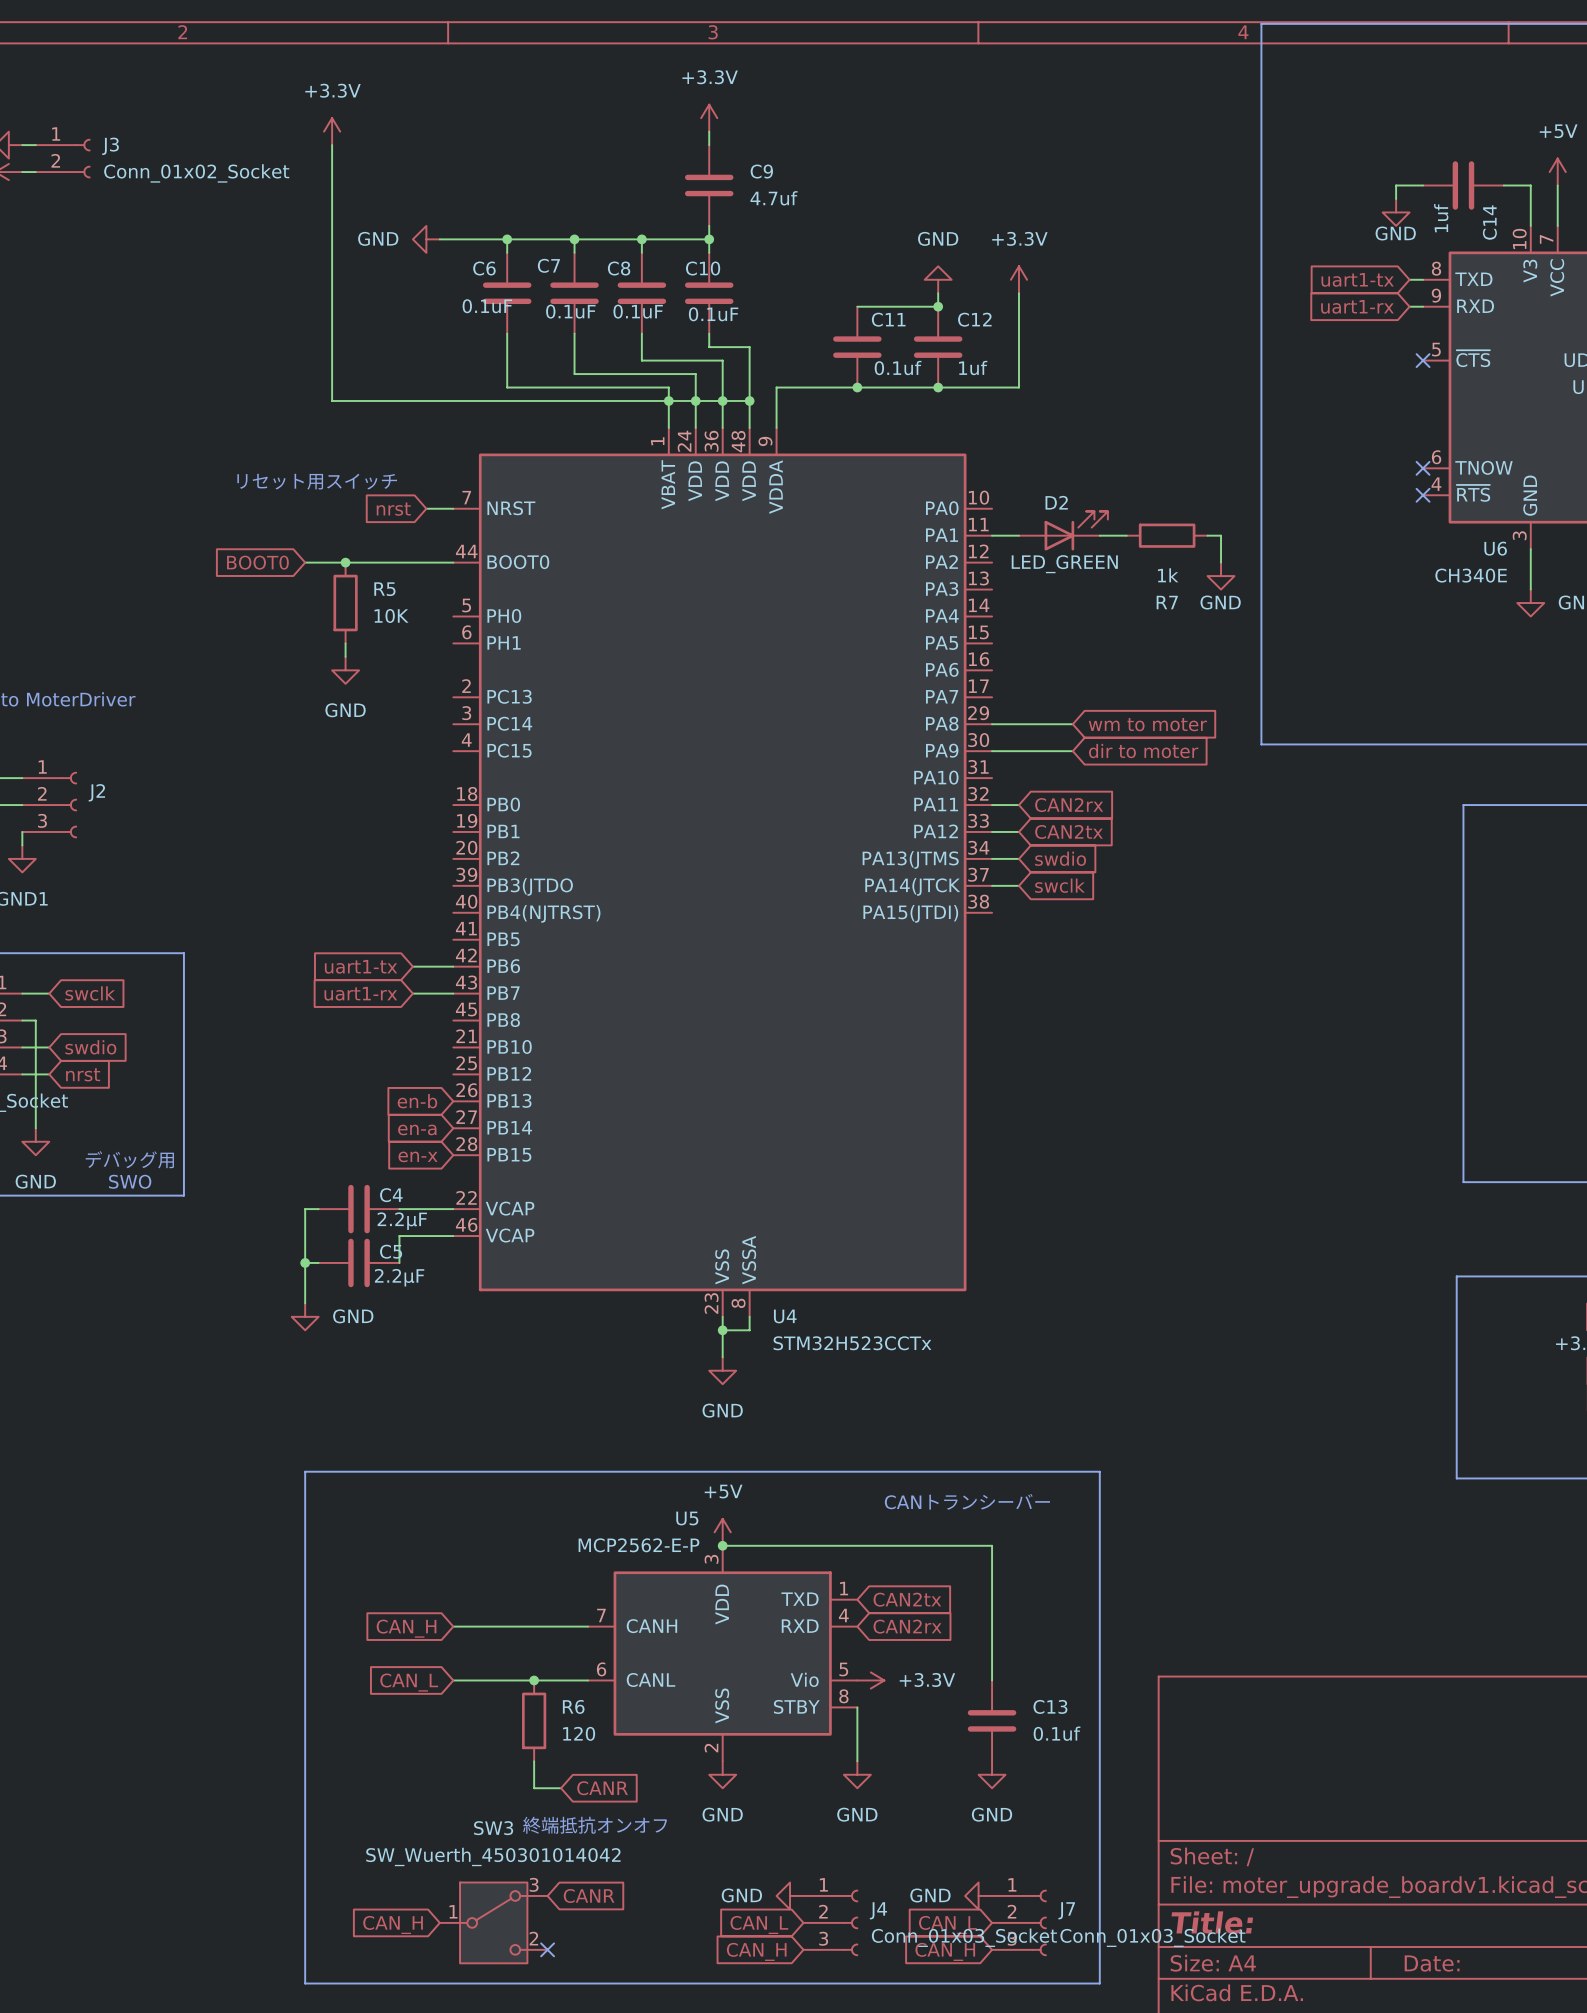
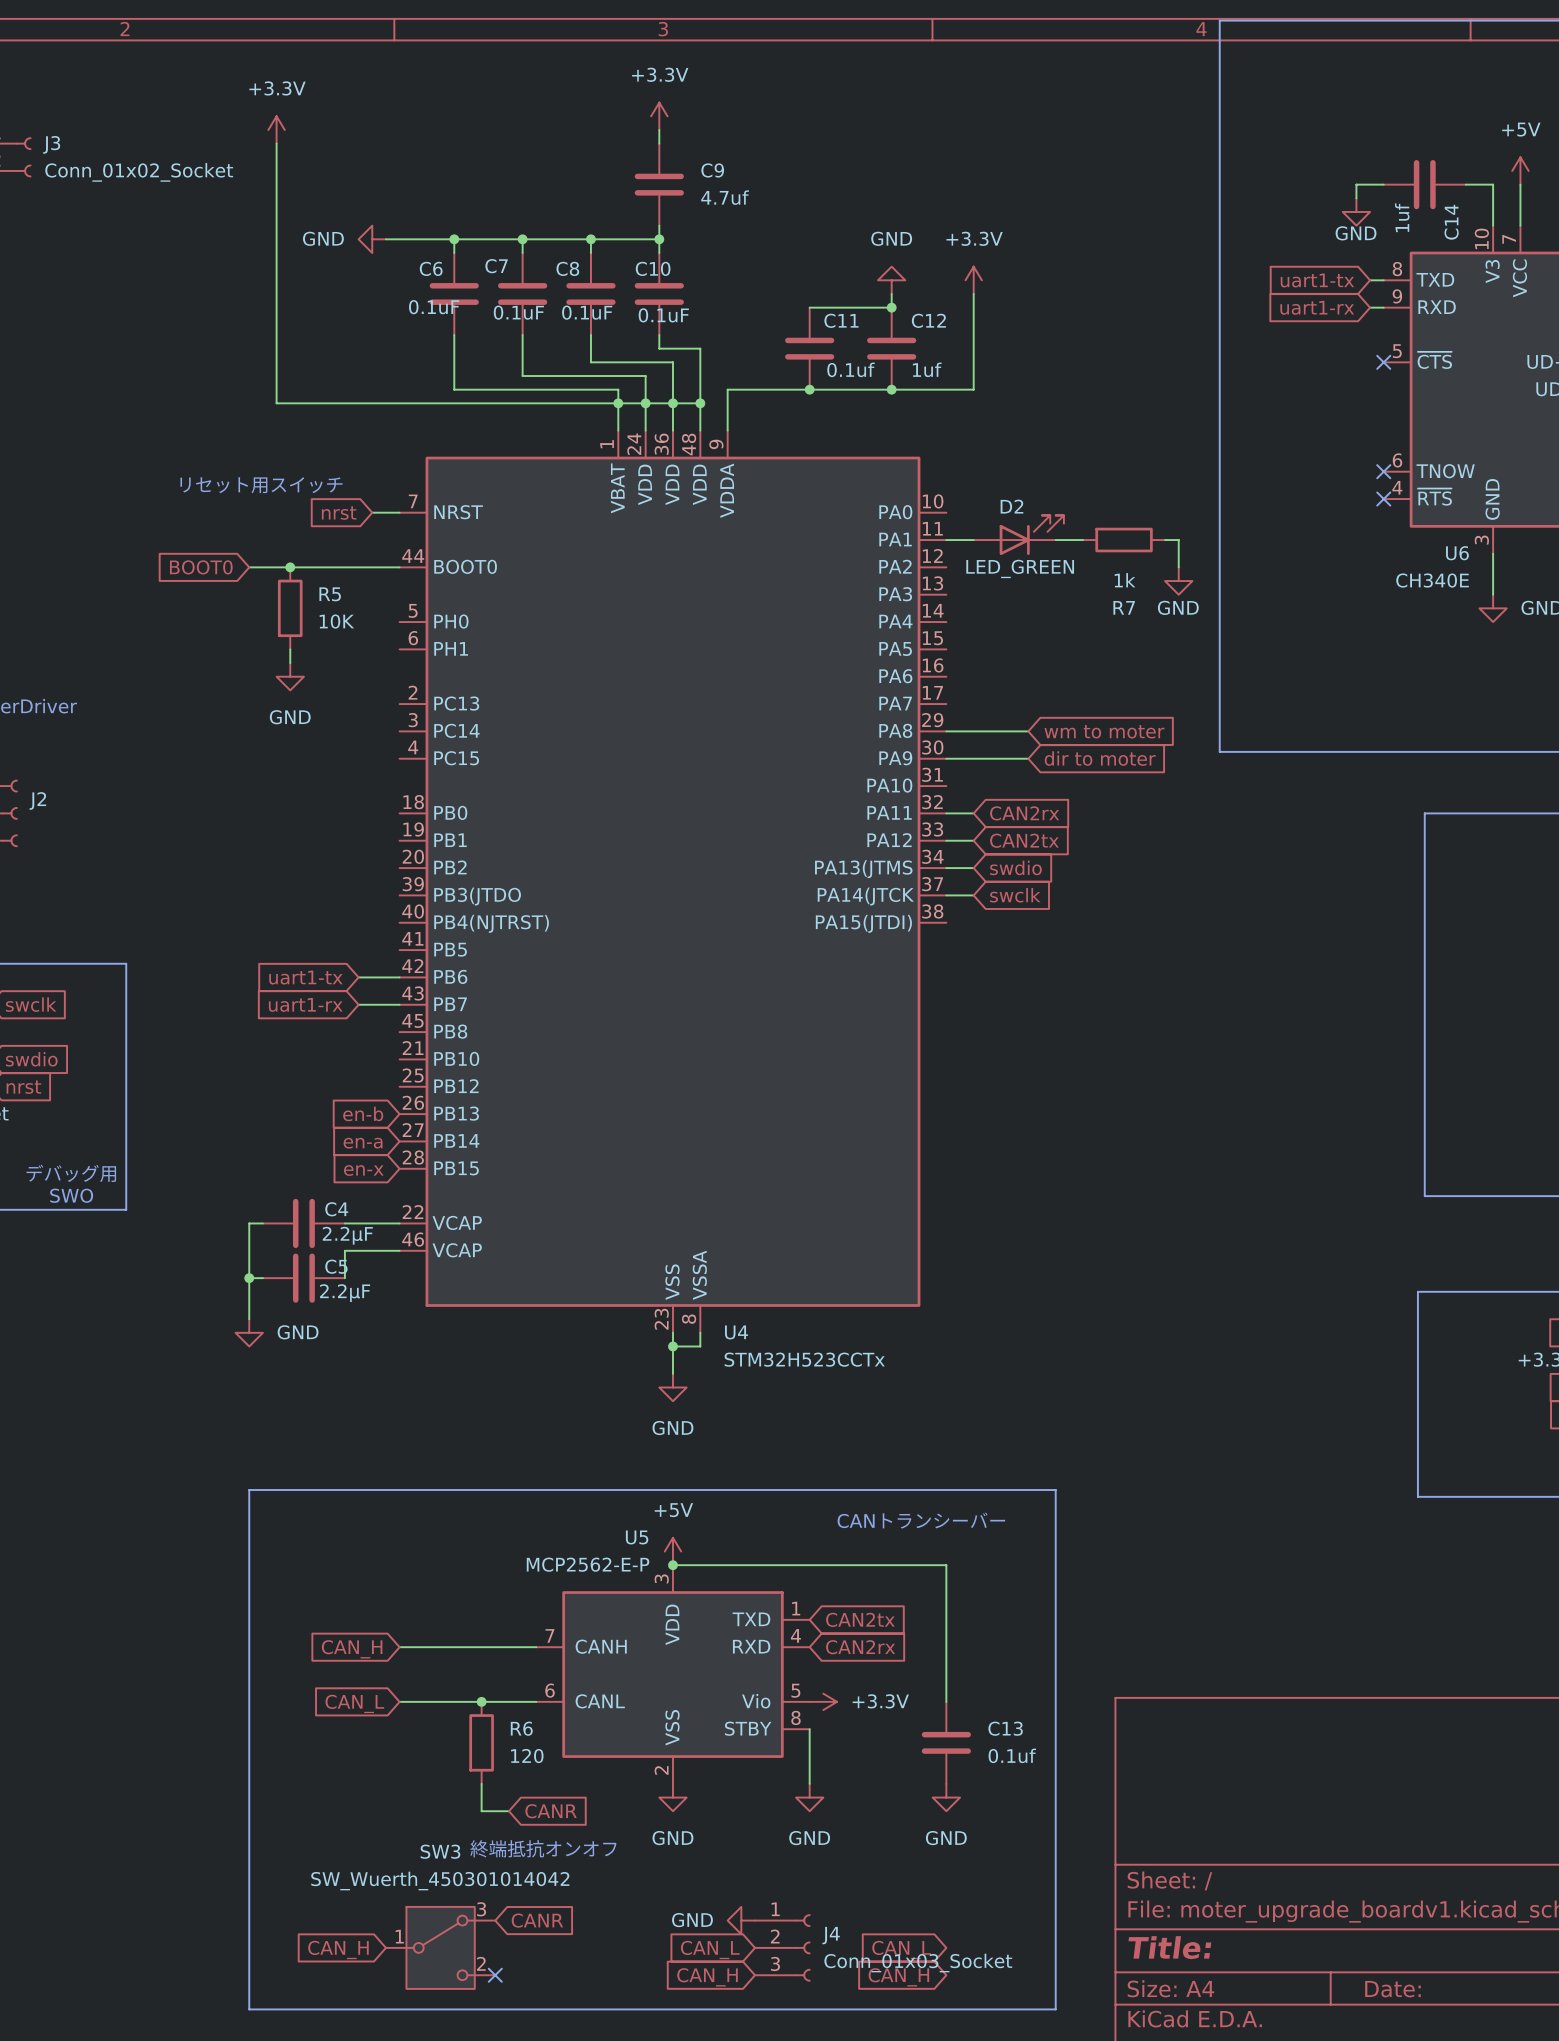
power symbol: GND (978, 1895) -> none
J7: Conn_01x03_Socket (1019, 1922) -> none

